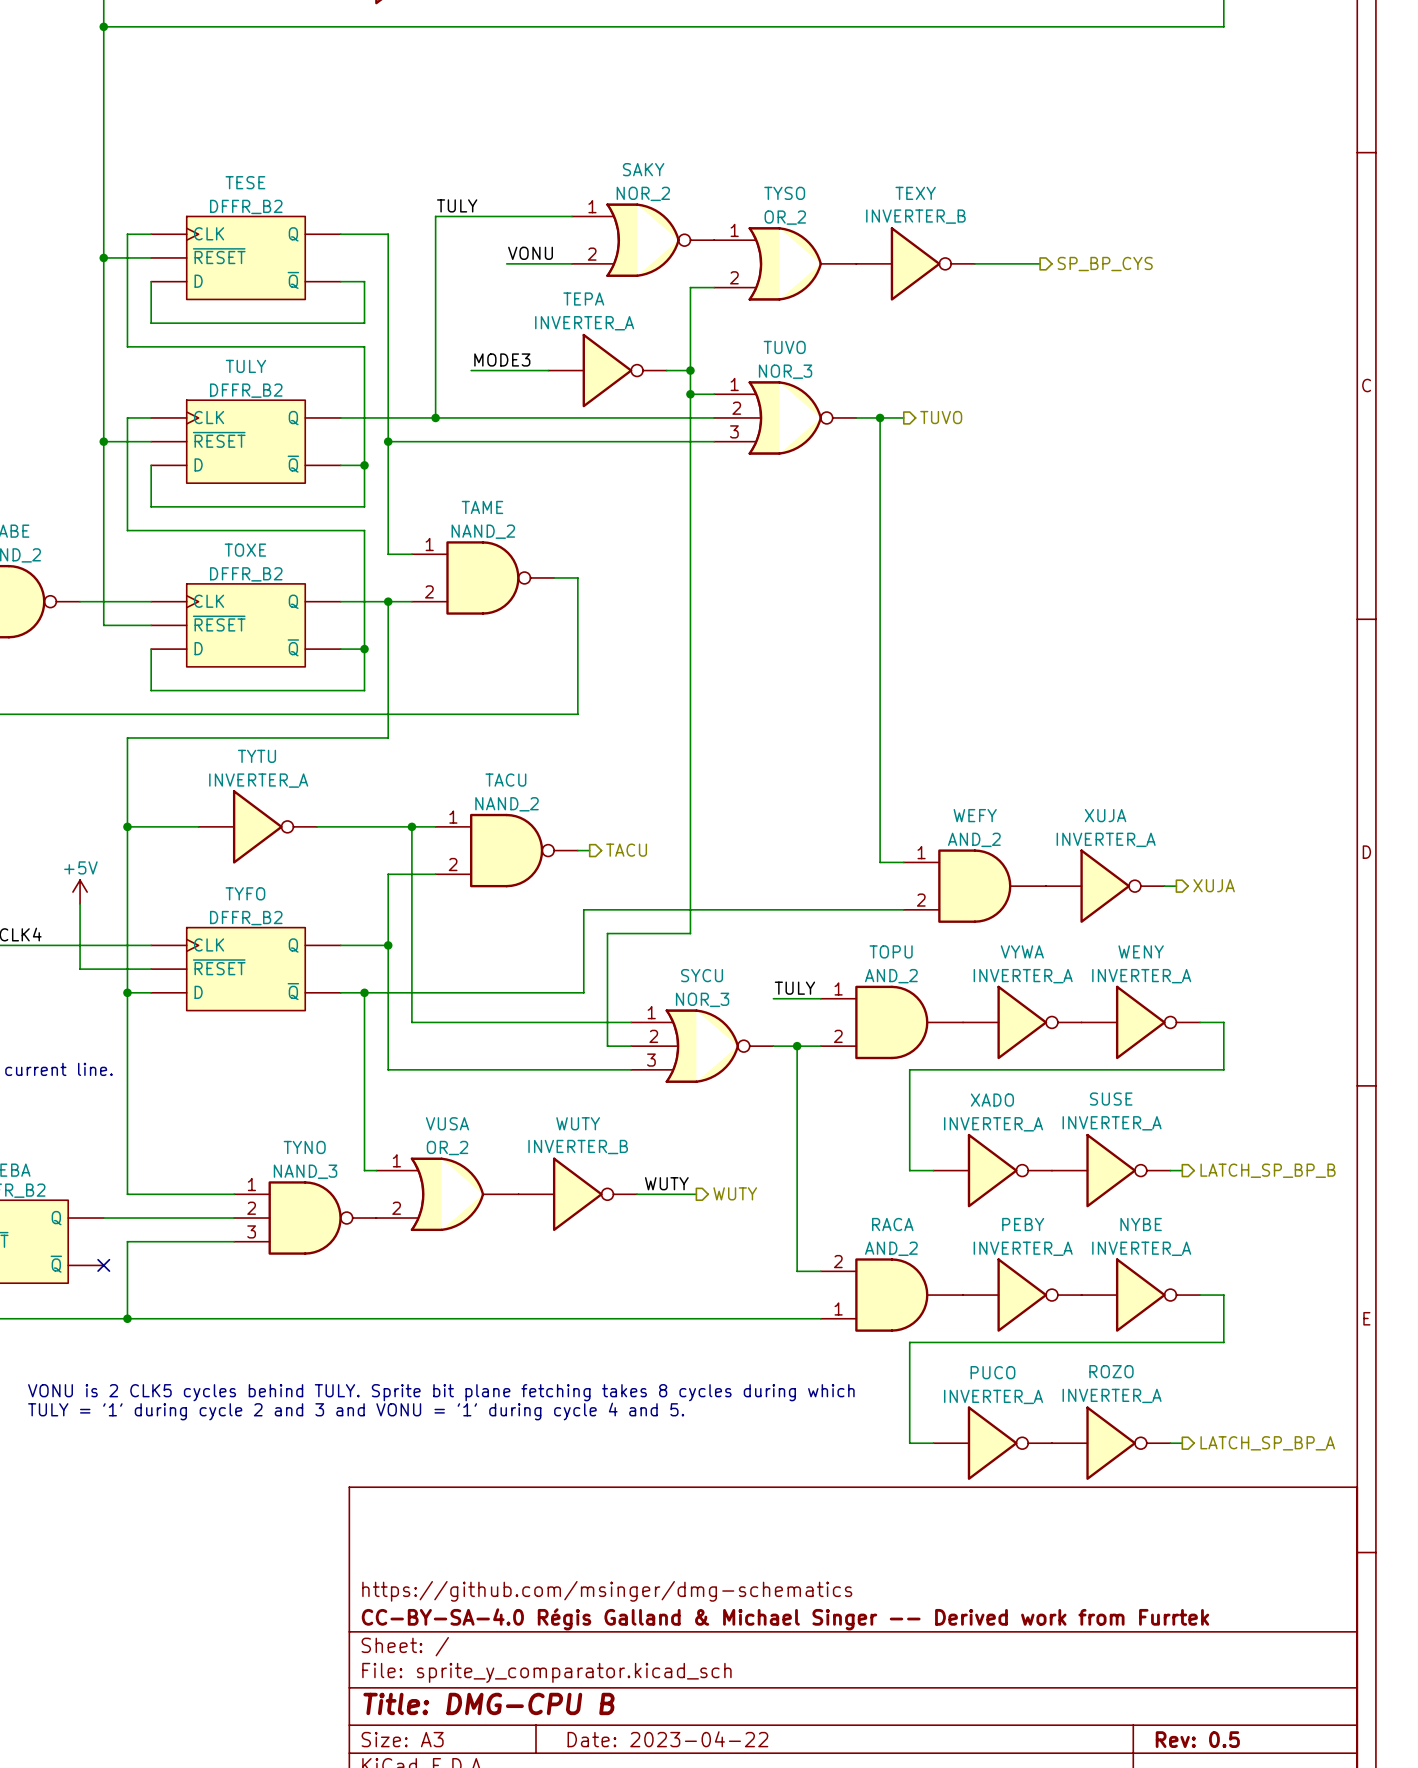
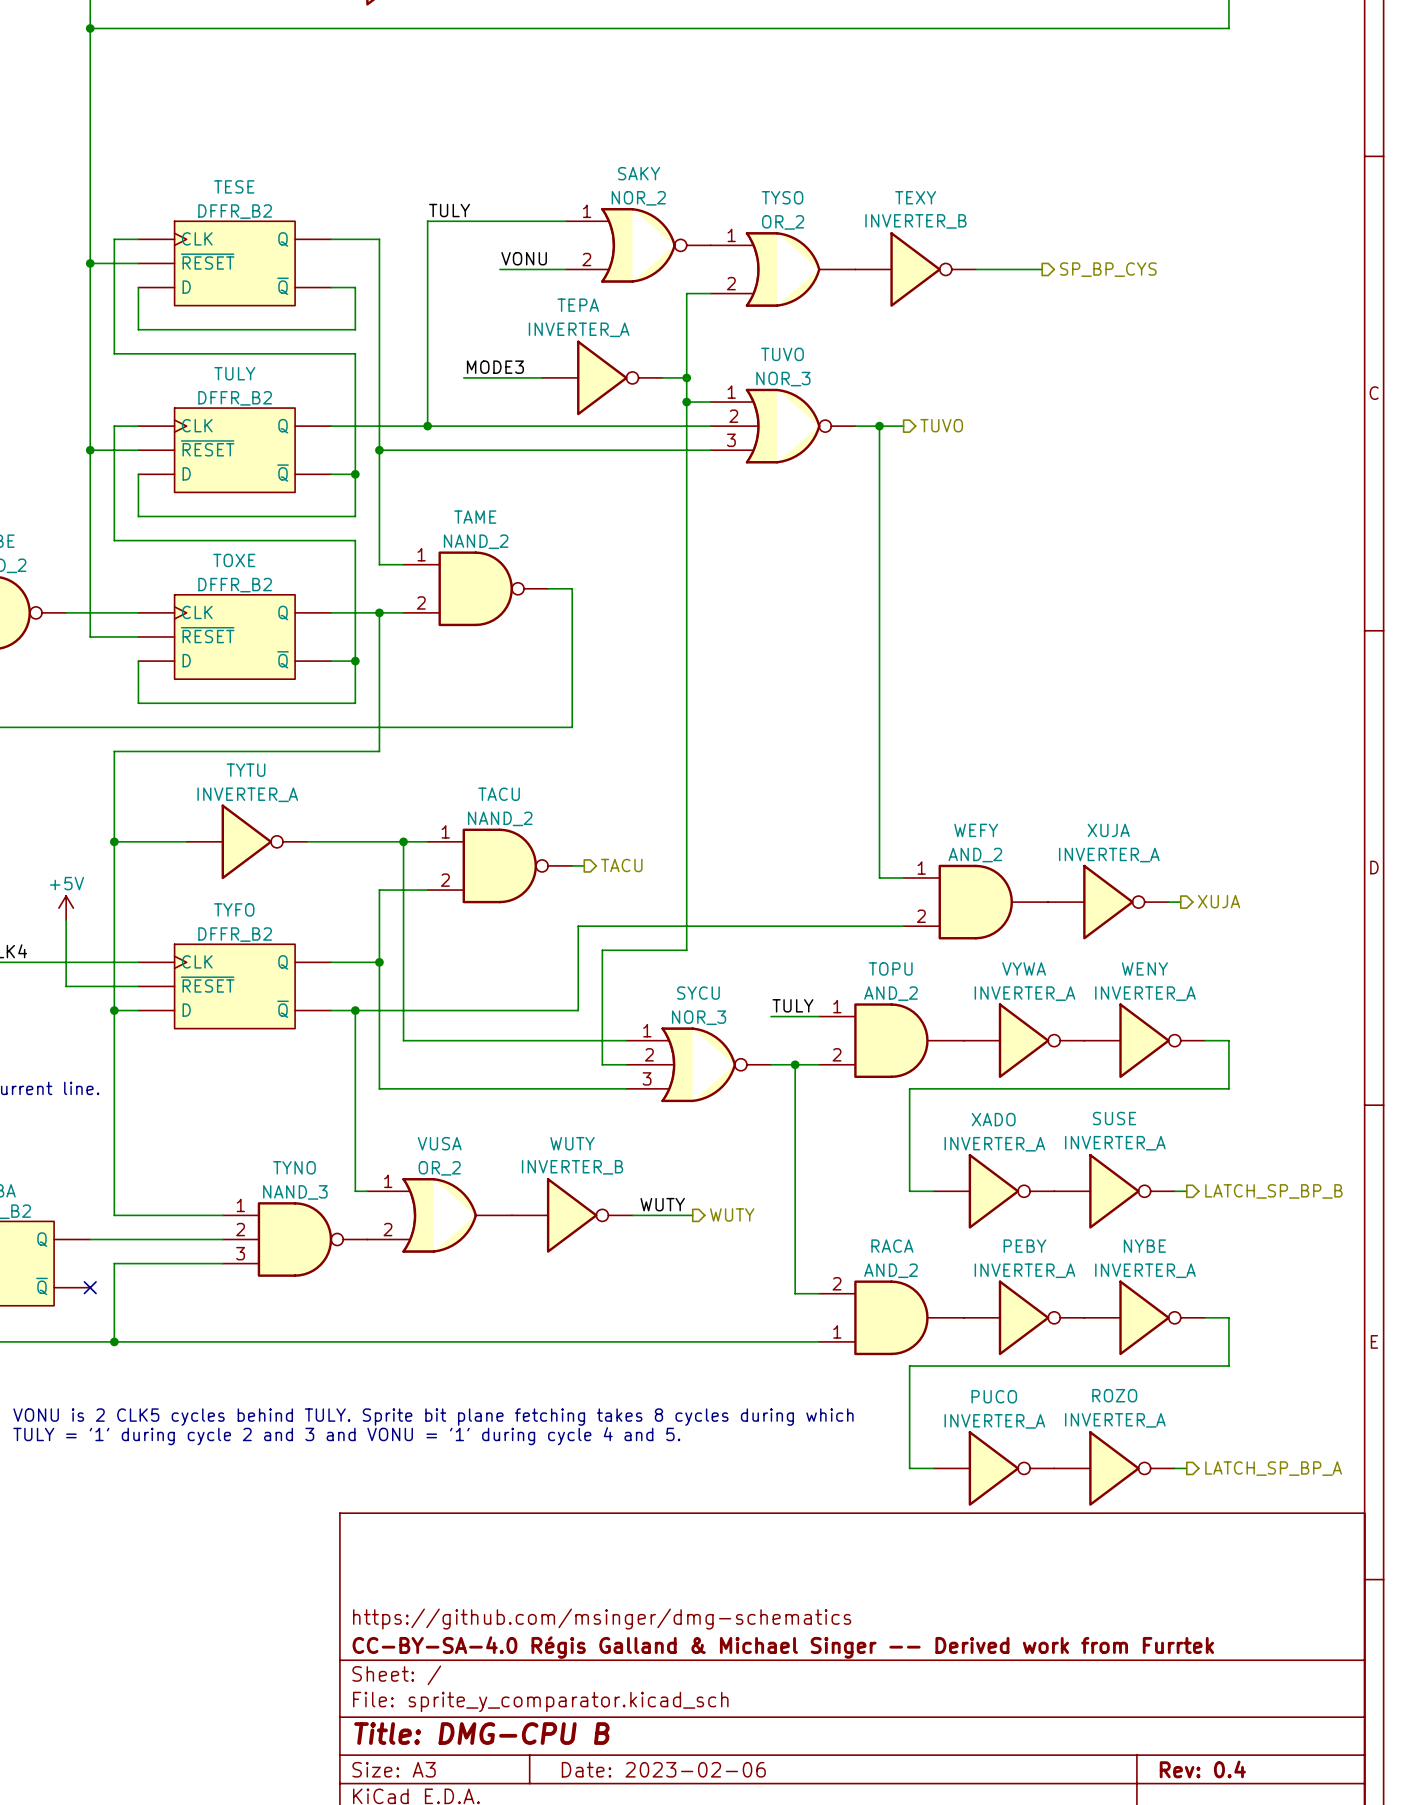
title block: Date: 2023-04-22 (667, 1739) -> Date: 2023-02-06 (663, 1769)
title block: Rev: 0.5 (1197, 1739) -> Rev: 0.4 (1202, 1769)

